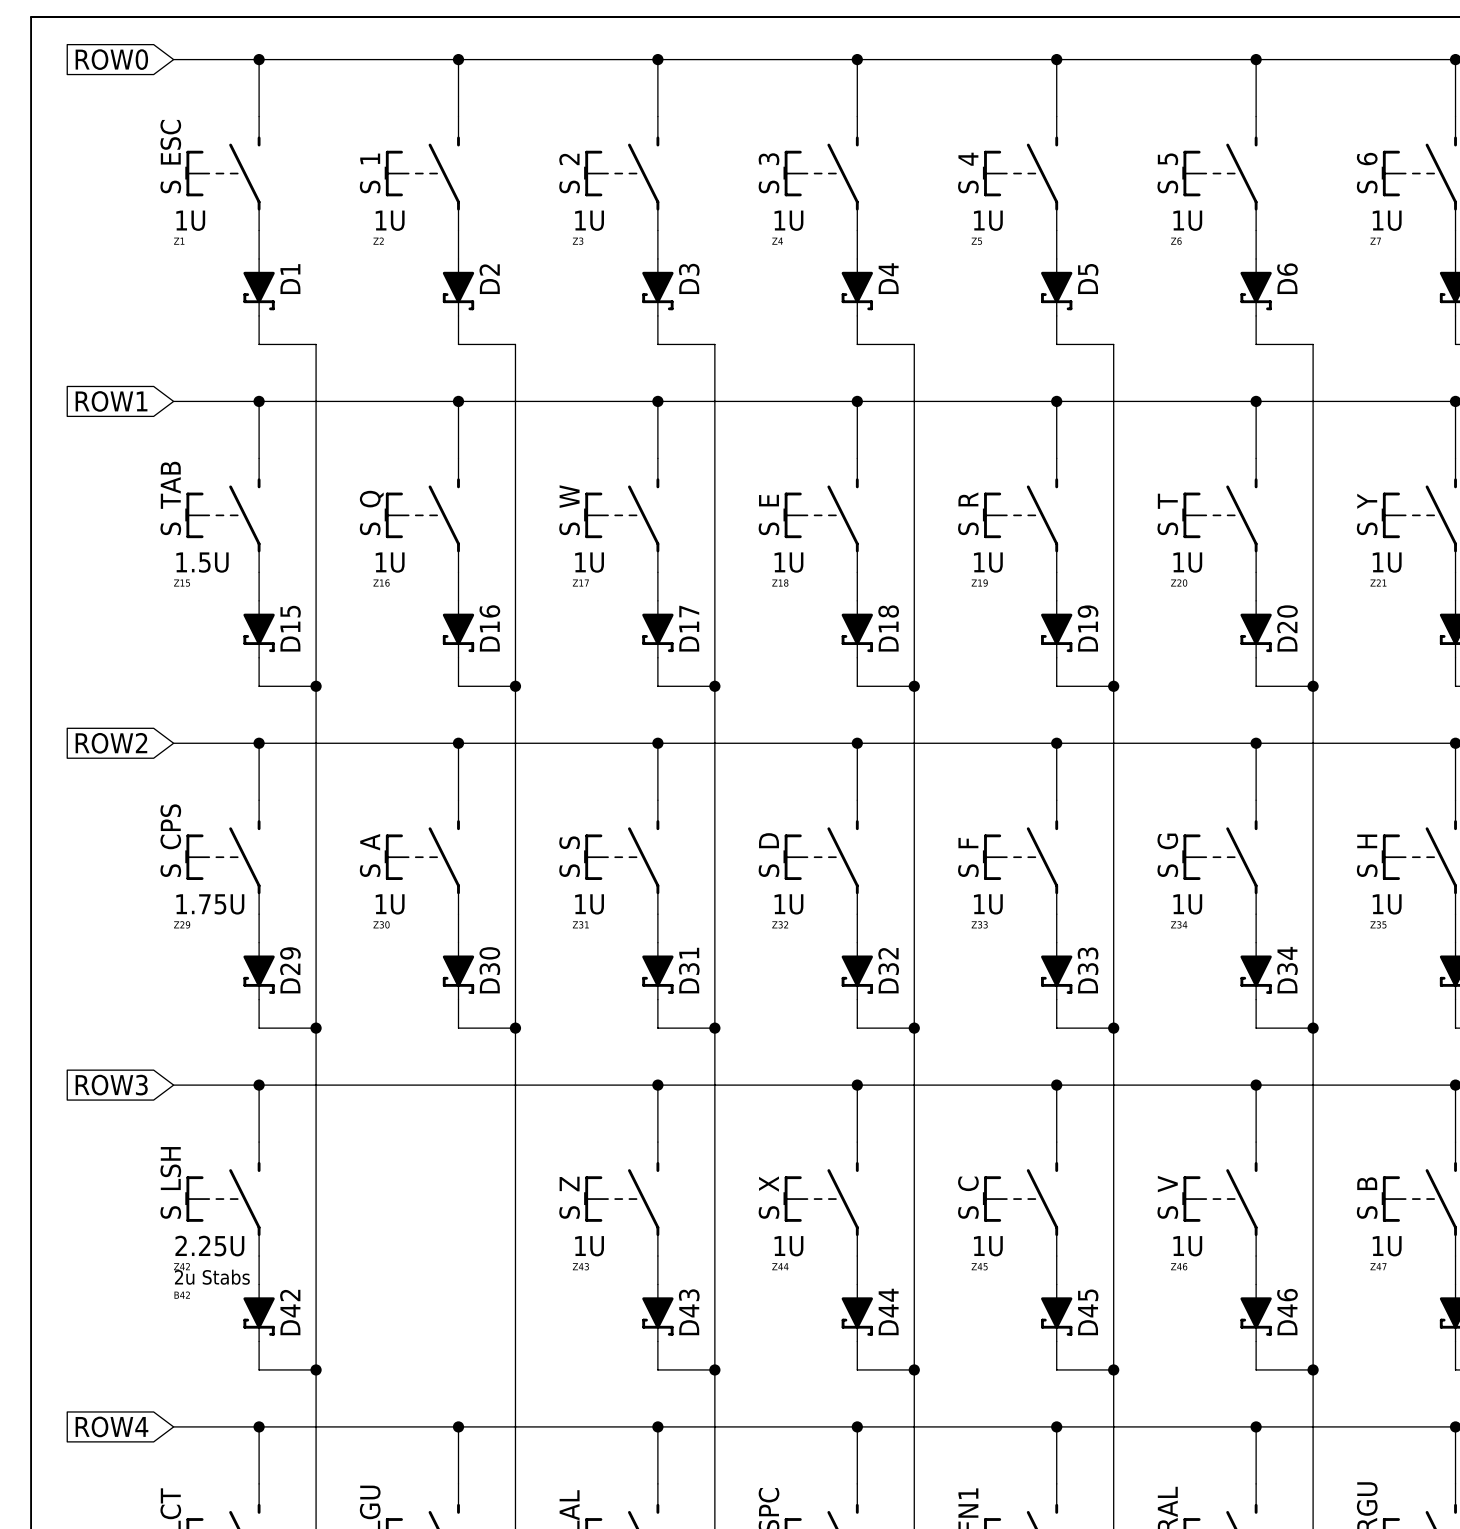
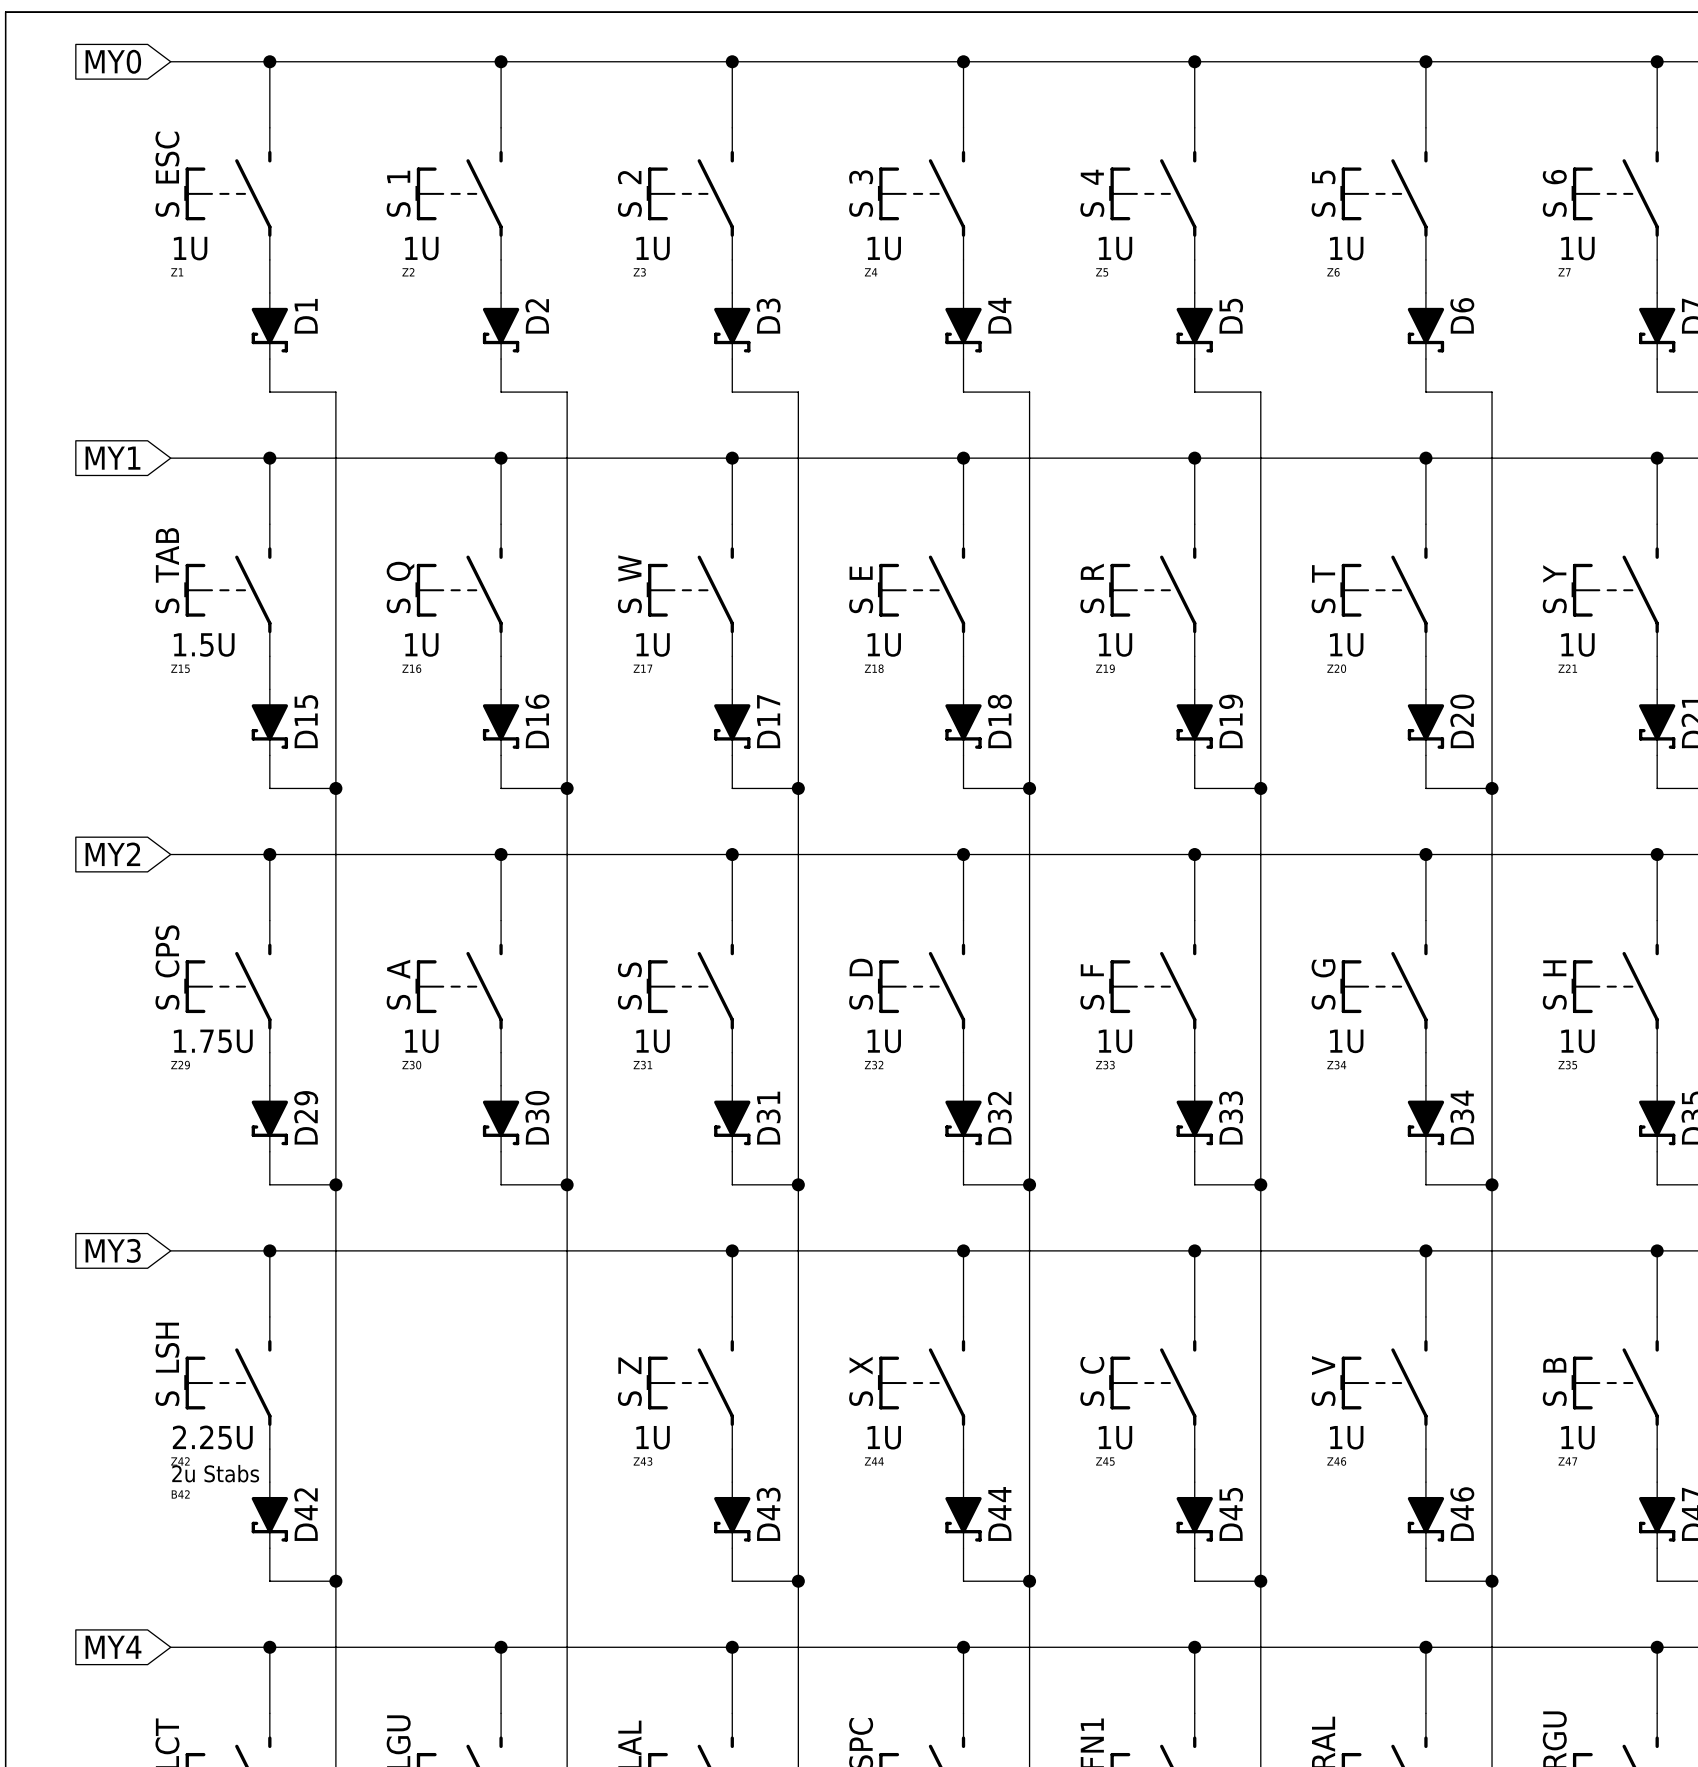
global label: ROW0 (111, 59) -> MY0 (113, 61)
global label: ROW1 (111, 401) -> MY1 (112, 458)
global label: ROW2 (111, 743) -> MY2 (112, 854)
global label: ROW3 (111, 1085) -> MY3 (113, 1250)
global label: ROW4 (111, 1426) -> MY4 (113, 1647)

